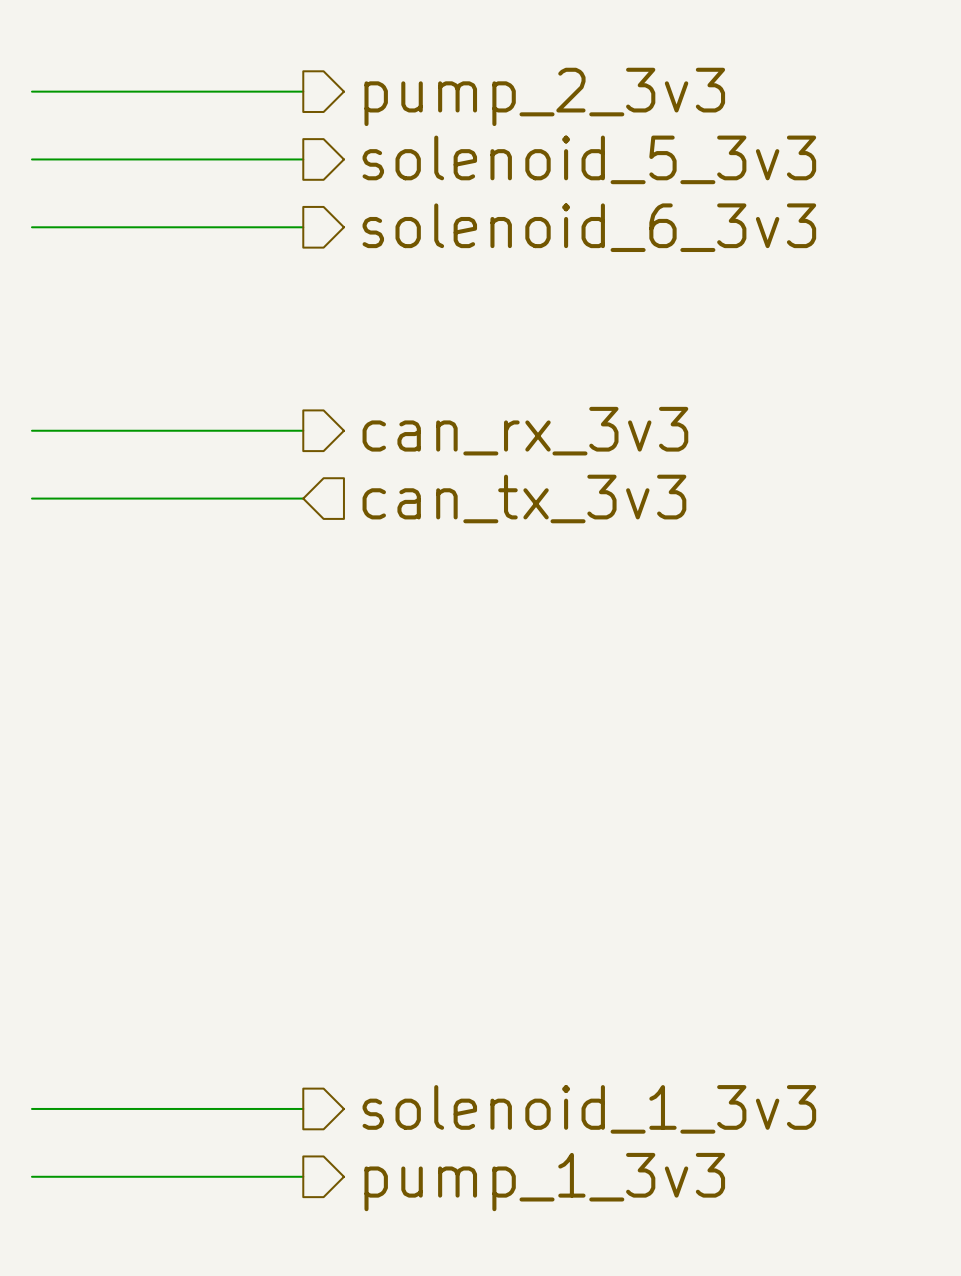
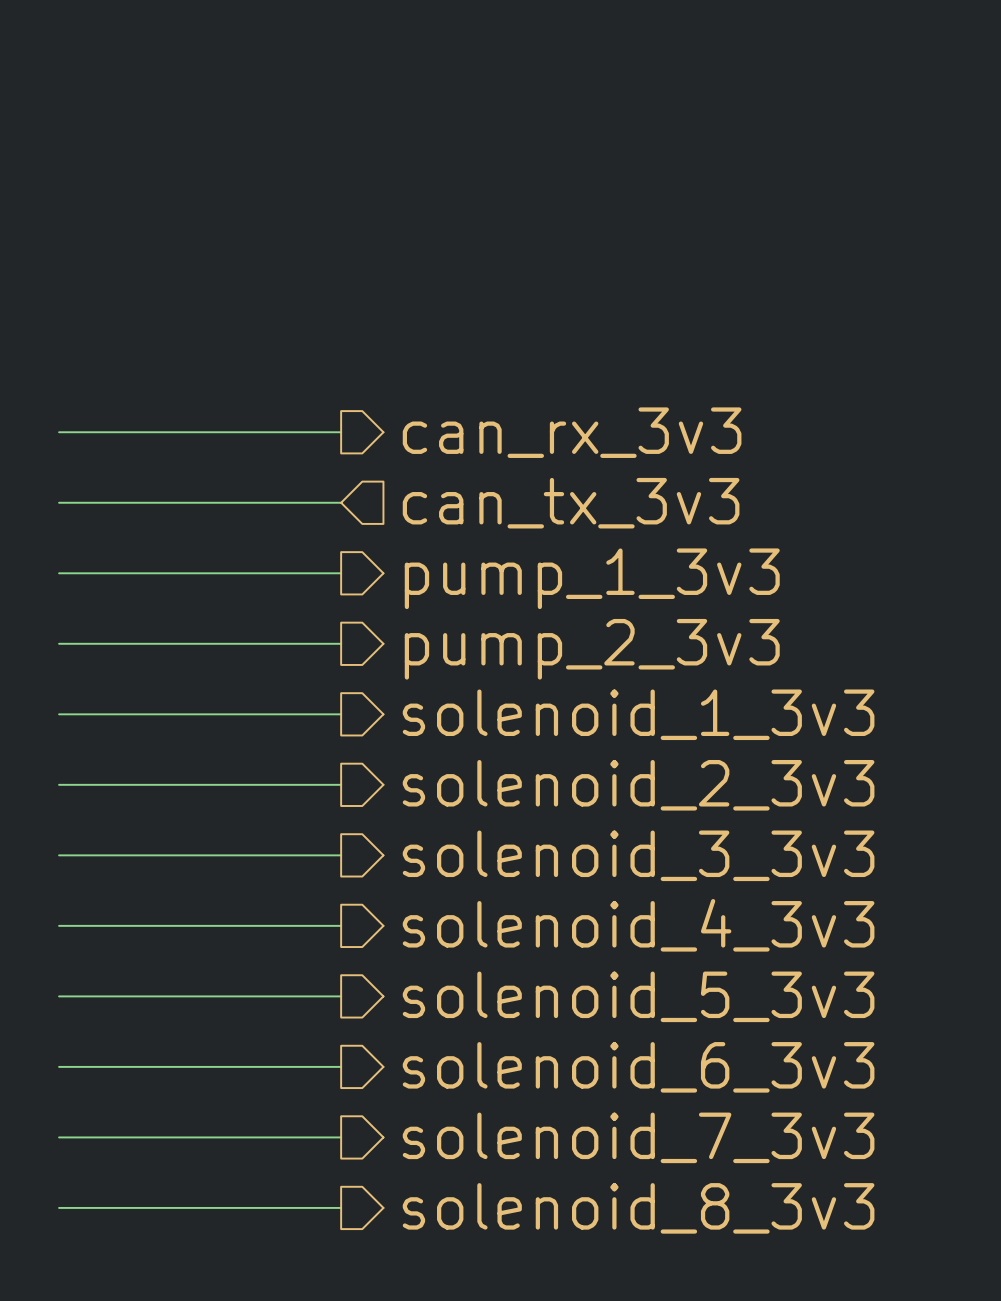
wire: (31, 91) (303, 91) -> (59, 573) (341, 573)
hierarchical label position: pump_2_3v3 (544, 96) -> pump_2_3v3 (592, 649)
wire: (31, 159) (303, 159) -> (59, 643) (341, 643)
hierarchical label: solenoid_5_3v3 (589, 159) -> none
wire: (31, 227) (303, 227) -> (59, 714) (341, 714)
hierarchical label: solenoid_6_3v3 (589, 227) -> none
hierarchical label: none -> pump_1_3v3 (592, 578)
hierarchical label: none -> solenoid_1_3v3 (638, 714)
wire: none -> (59, 784) (341, 784)
hierarchical label: none -> solenoid_2_3v3 (638, 785)
wire: none -> (59, 855) (341, 855)
hierarchical label: none -> solenoid_3_3v3 (638, 855)
hierarchical label: none -> solenoid_4_3v3 (638, 925)
wire: none -> (59, 925) (341, 925)
wire: none -> (59, 996) (341, 996)
hierarchical label: none -> solenoid_5_3v3 (638, 996)
wire: none -> (59, 1066) (341, 1066)
hierarchical label: none -> solenoid_6_3v3 (638, 1067)
hierarchical label: solenoid_1_3v3 (589, 1109) -> solenoid_7_3v3 (638, 1137)
hierarchical label: pump_1_3v3 (544, 1182) -> solenoid_8_3v3 (638, 1208)

